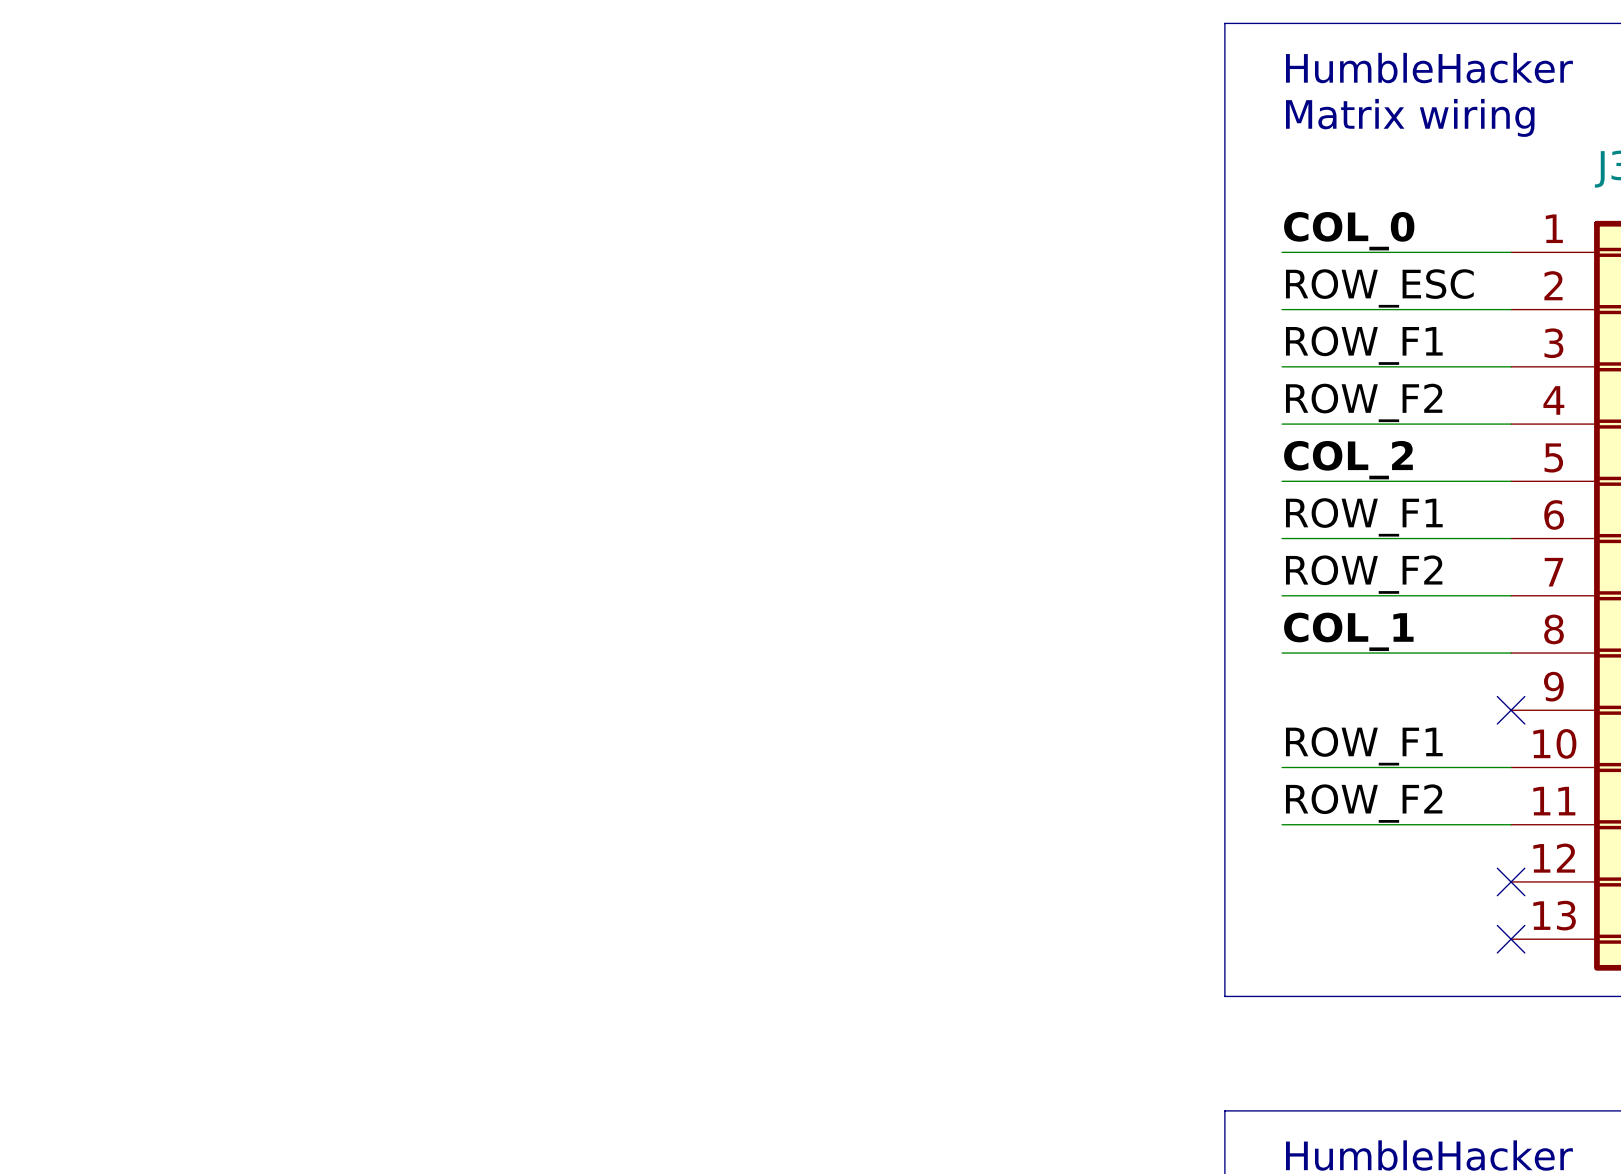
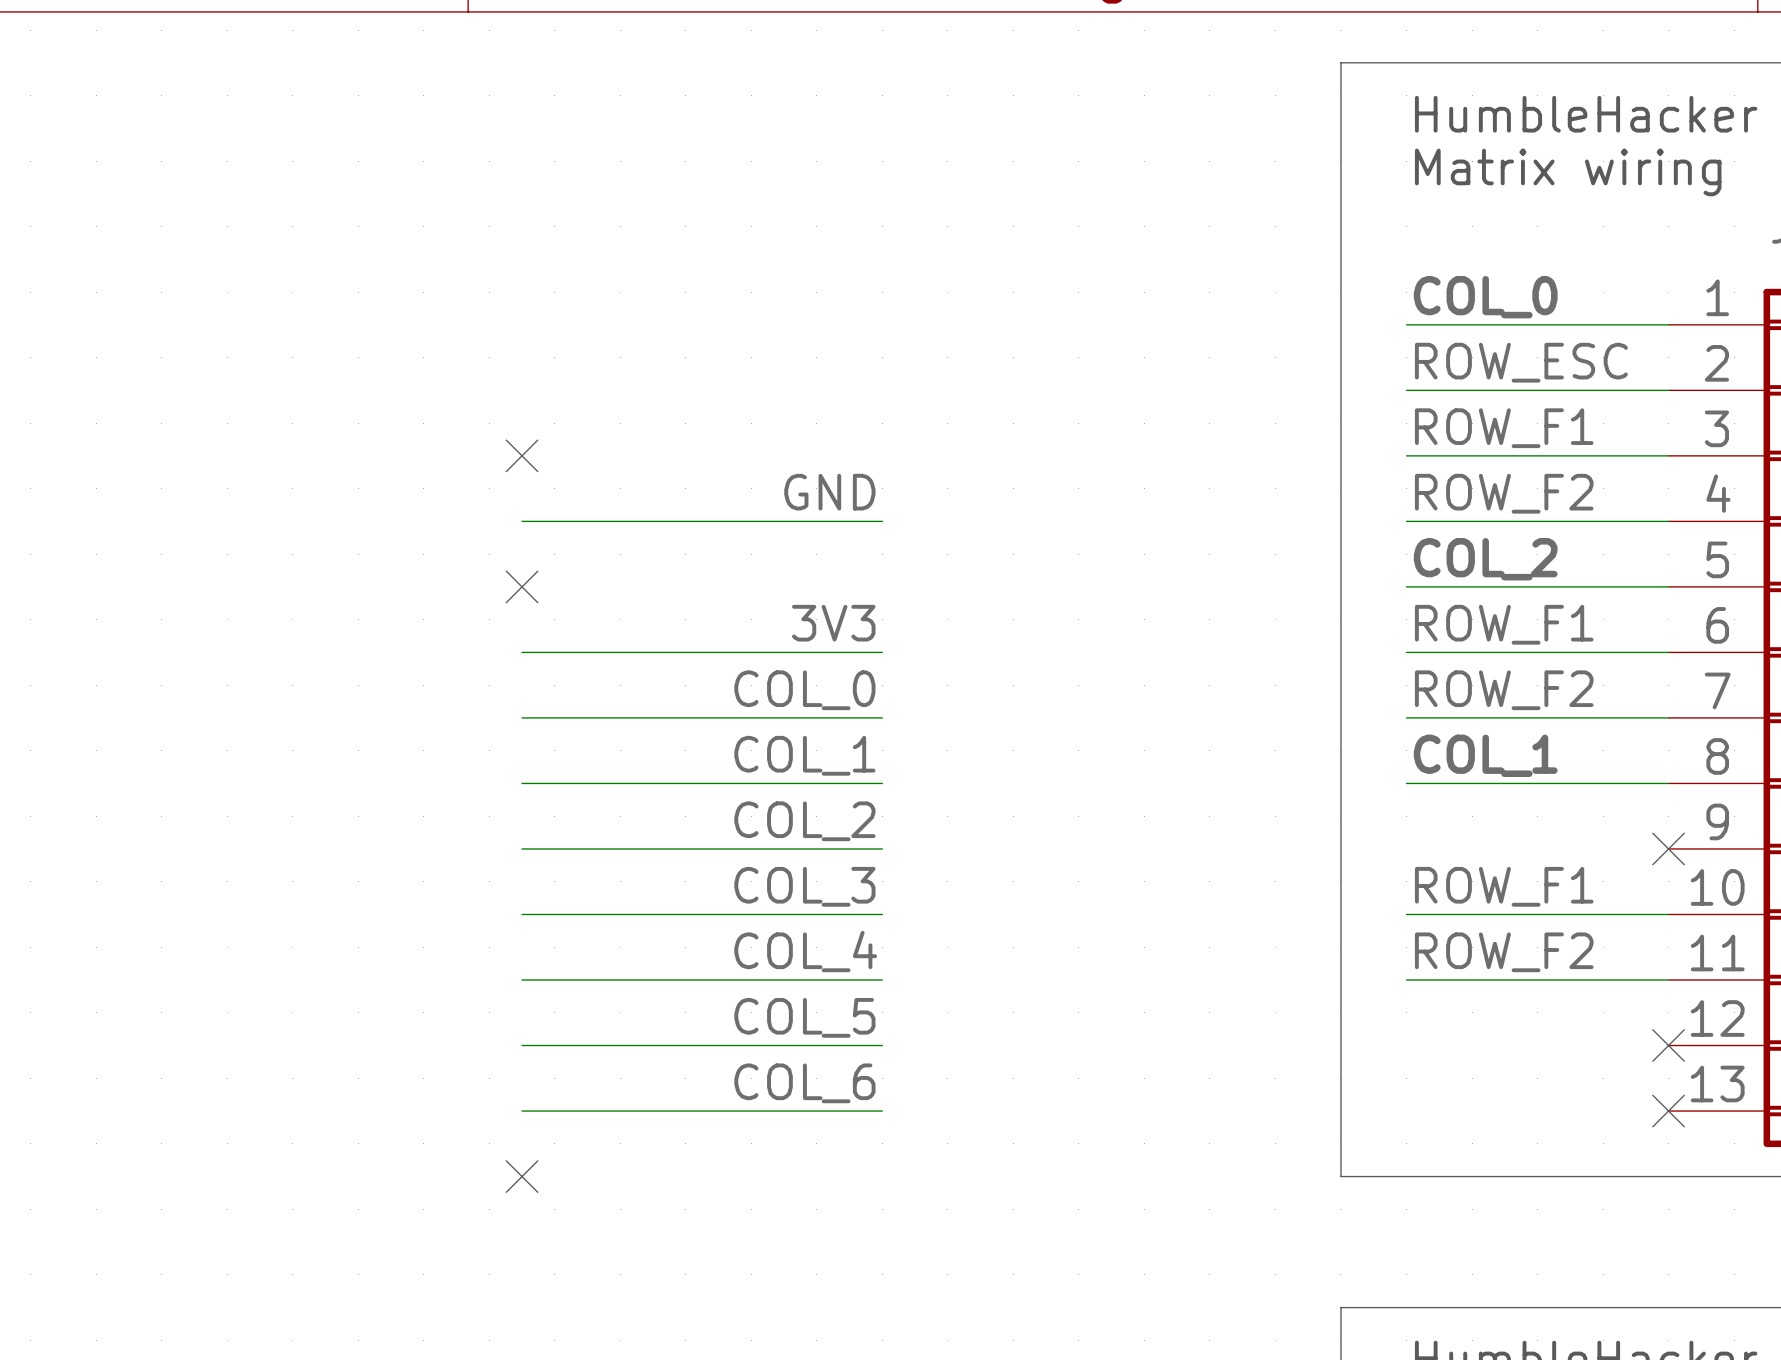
no-connect mark: none -> (522, 455)
label: none -> GND (829, 492)
wire: none -> (522, 521) (882, 521)
no-connect mark: none -> (522, 586)
label: none -> 3V3 (833, 623)
wire: none -> (522, 652) (882, 652)
label: none -> COL_0 (804, 690)
wire: none -> (522, 717) (882, 717)
label: none -> COL_1 (804, 755)
wire: none -> (522, 783) (882, 783)
label: none -> COL_2 (804, 821)
wire: none -> (522, 848) (882, 848)
label: none -> COL_3 (804, 886)
wire: none -> (522, 914) (882, 914)
label: none -> COL_4 (805, 951)
wire: none -> (522, 980) (882, 980)
label: none -> COL_5 (804, 1017)
wire: none -> (522, 1045) (882, 1045)
label: none -> COL_6 (804, 1083)
wire: none -> (522, 1111) (882, 1111)
no-connect mark: none -> (522, 1176)

